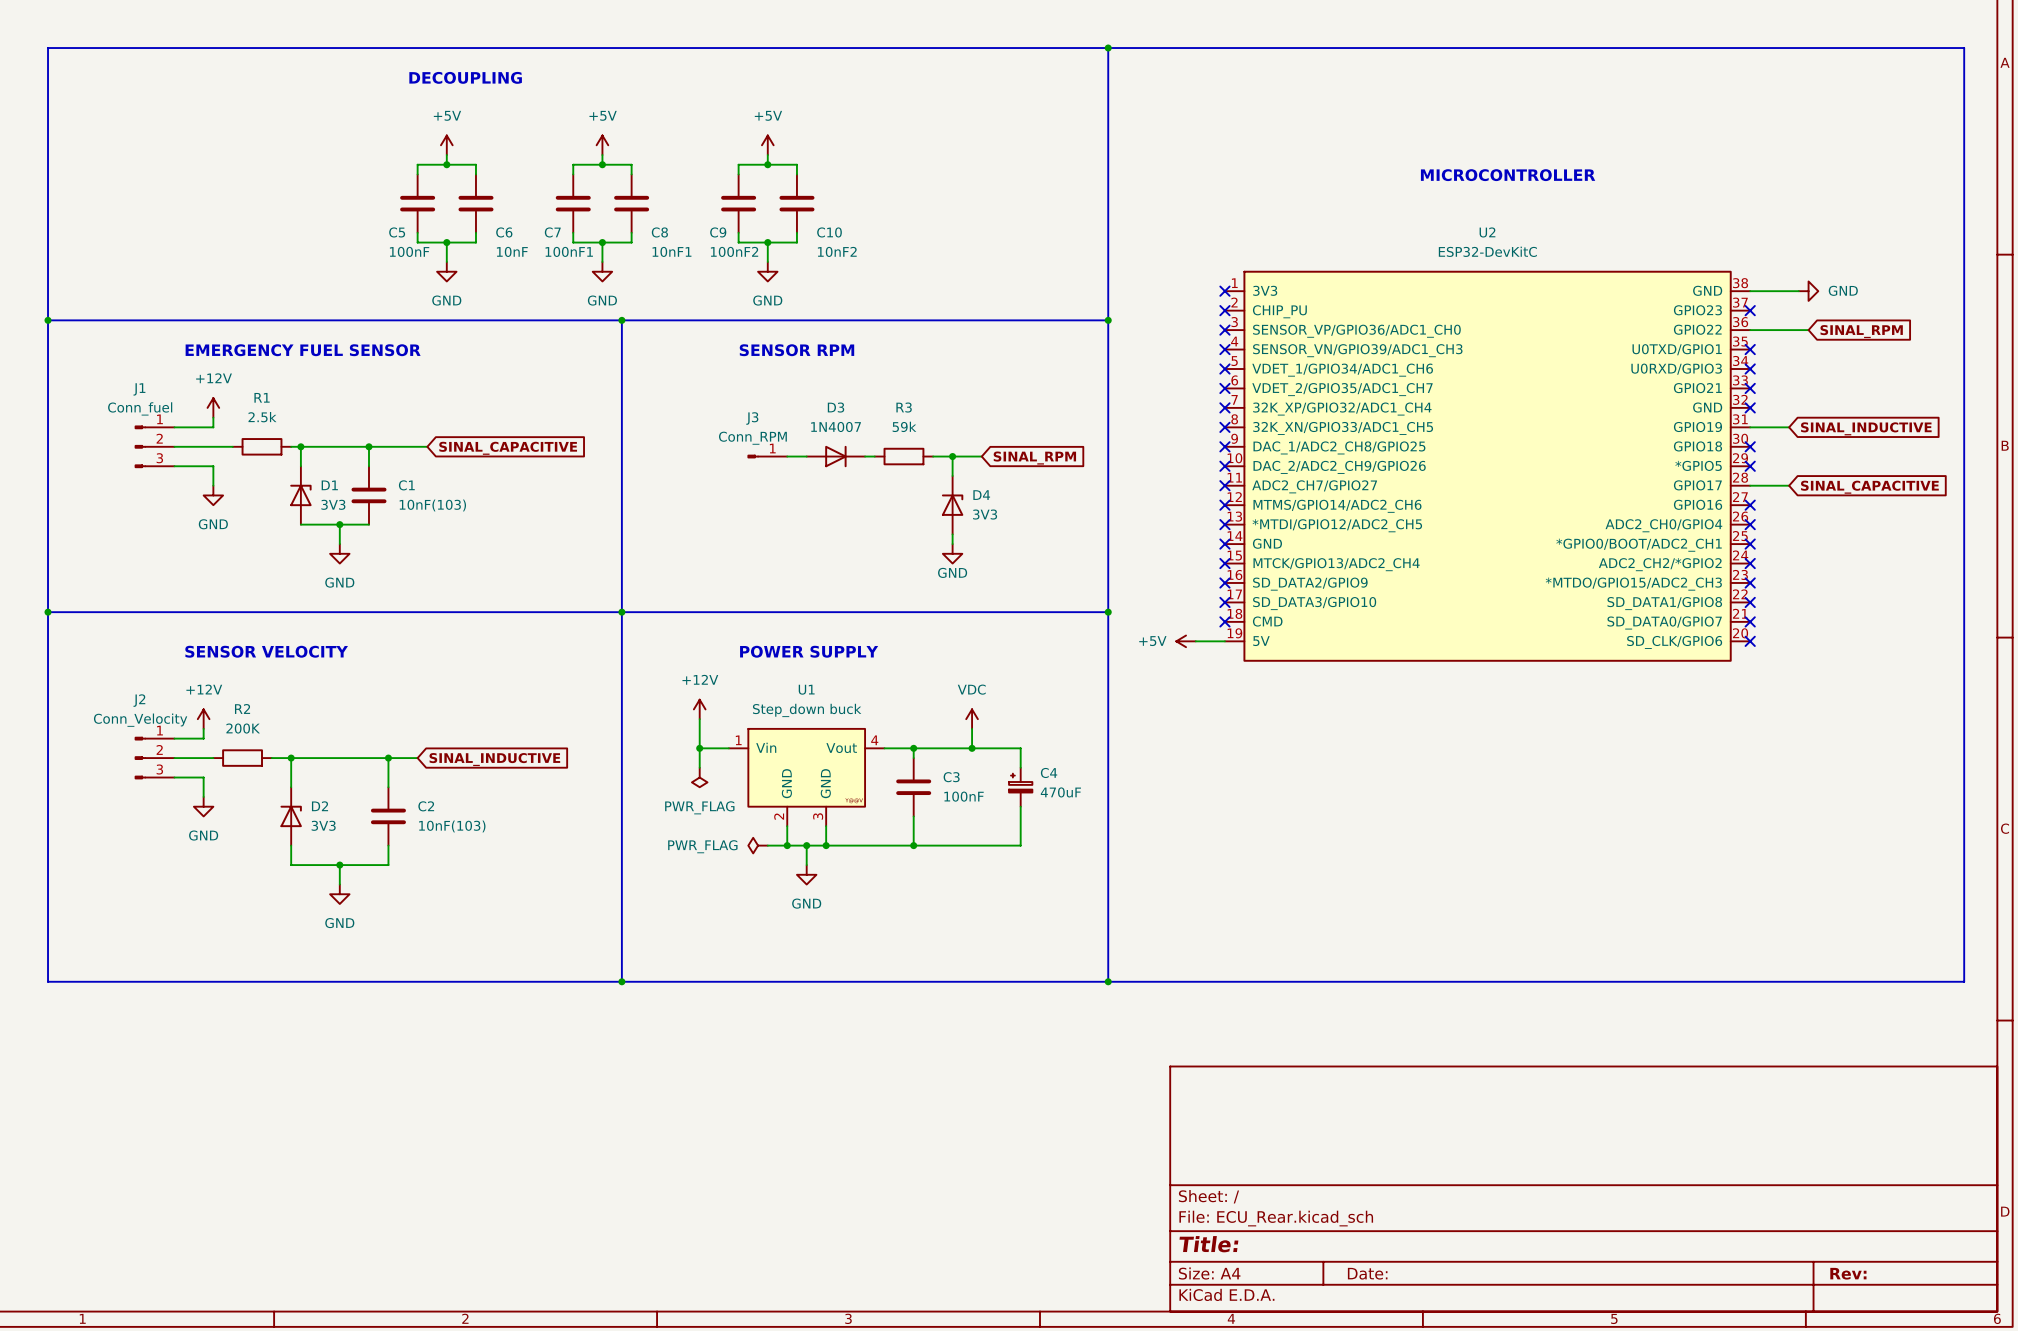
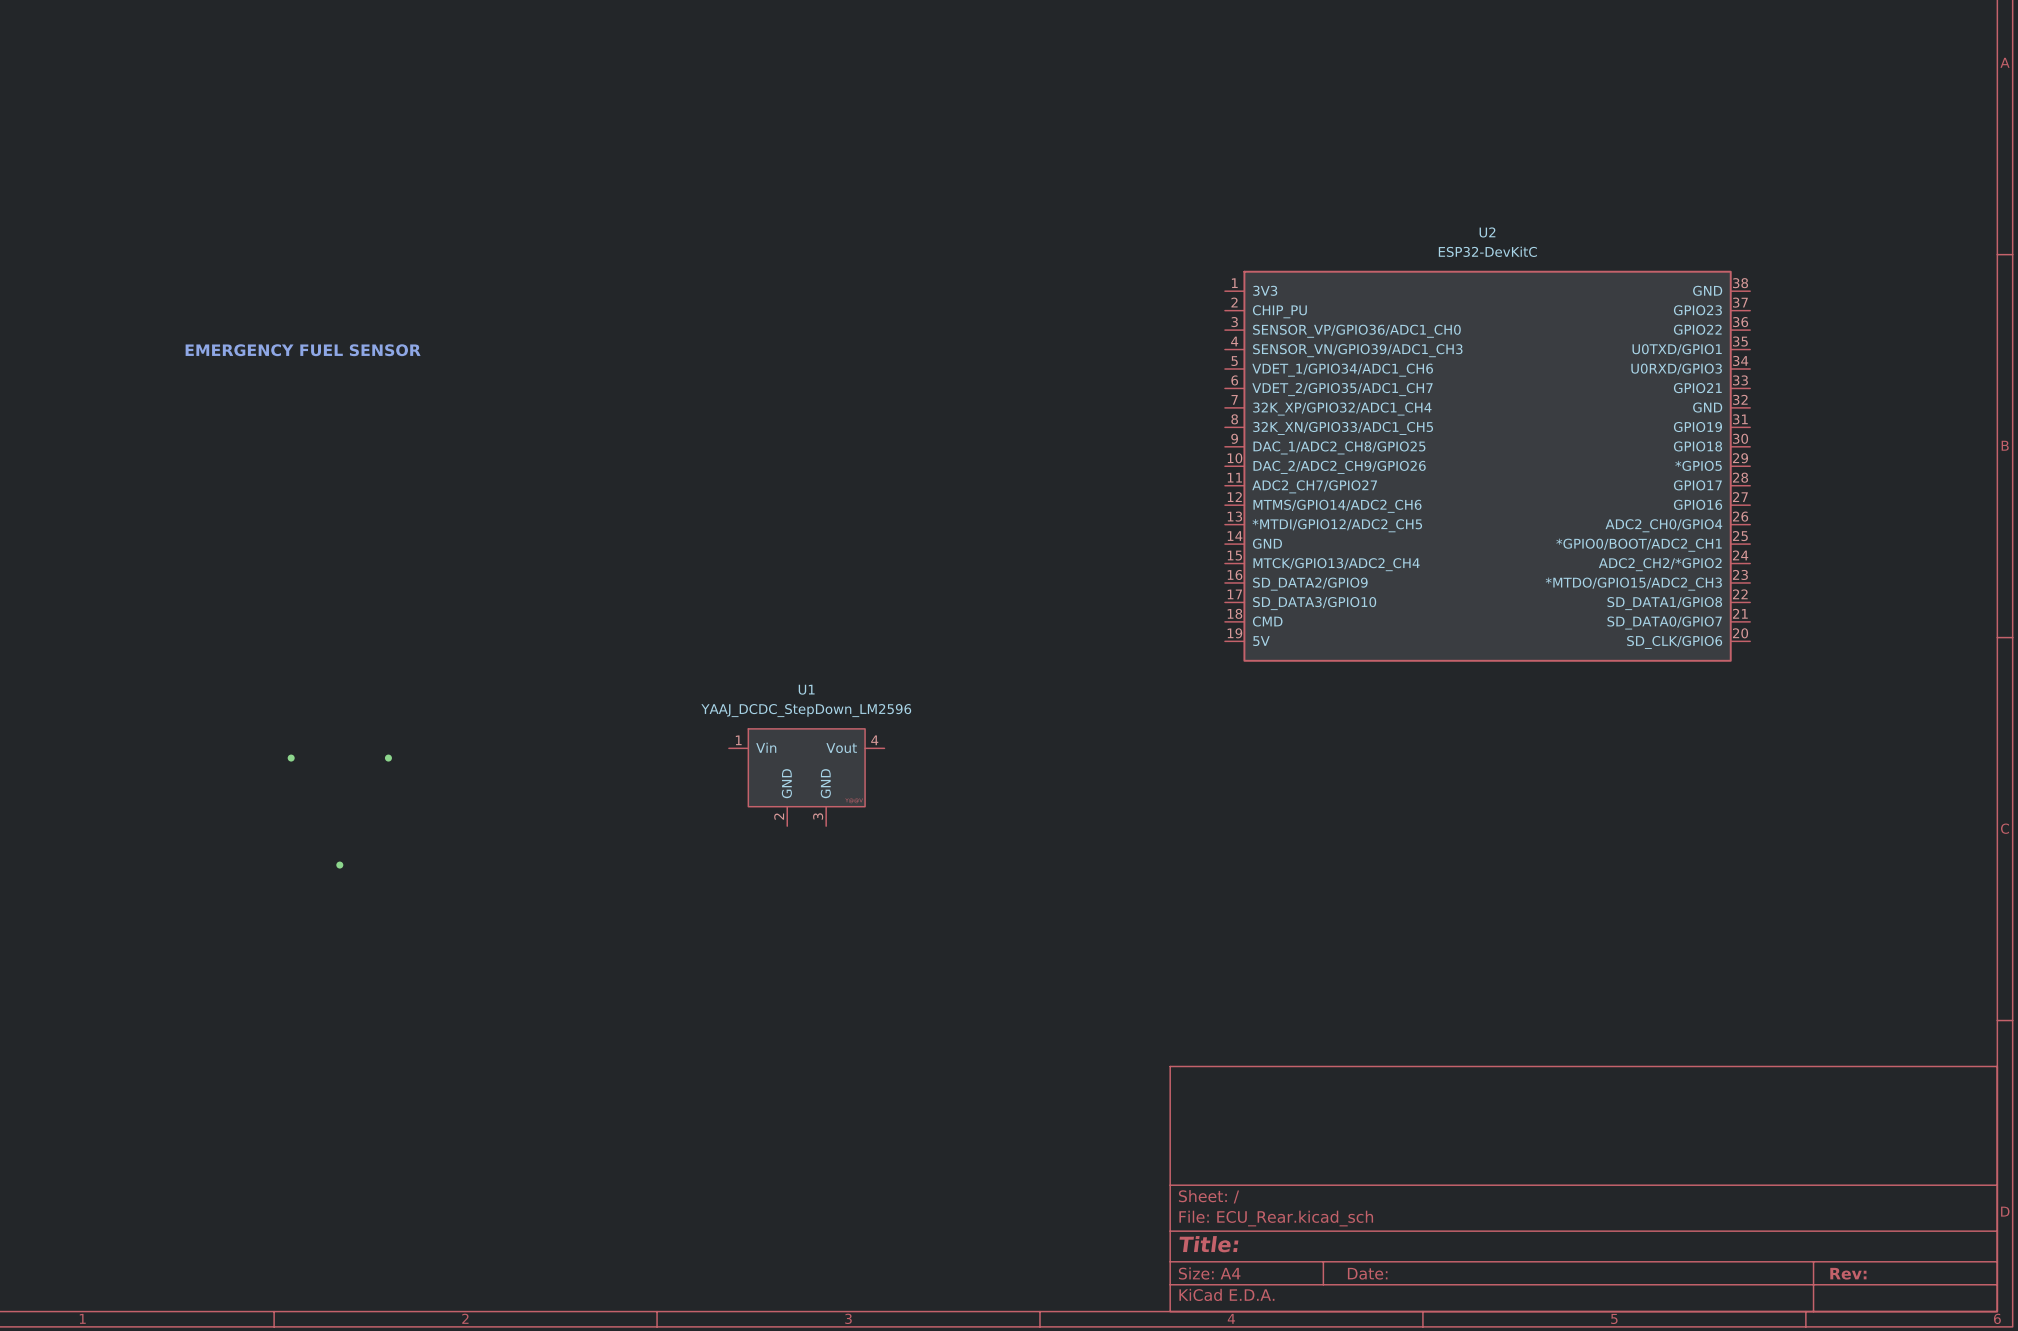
bus: (48, 48) (1964, 48) (1964, 981) (48, 981) (48, 48) -> none
bus: (1108, 48) (1108, 981) -> none
junction: (1108, 48) -> none
text: DECOUPLING (465, 77) -> none
power symbol: +5V (446, 145) -> none
power symbol: +5V (602, 145) -> none
power symbol: +5V (767, 145) -> none
wire: (446, 155) (446, 164) -> none
wire: (602, 155) (602, 164) -> none
wire: (767, 155) (767, 164) -> none
junction: (446, 164) -> none
junction: (602, 164) -> none
junction: (767, 164) -> none
wire: (417, 174) (417, 164) (475, 164) (475, 174) -> none
wire: (573, 174) (573, 164) (631, 164) (631, 174) -> none
wire: (738, 174) (738, 164) (796, 164) (796, 174) -> none
text: MICROCONTROLLER (1508, 175) -> none
100nF: C5 (417, 203) -> none
10nF: C6 (475, 203) -> none
100nF1: C7 (573, 203) -> none
10nF1: C8 (631, 203) -> none
100nF2: C9 (738, 203) -> none
10nF2: C10 (796, 203) -> none
wire: (417, 232) (417, 242) (475, 242) (475, 232) -> none
wire: (573, 232) (573, 242) (631, 242) (631, 232) -> none
wire: (738, 232) (738, 242) (796, 242) (796, 232) -> none
wire: (446, 242) (446, 262) -> none
junction: (446, 242) -> none
wire: (602, 242) (602, 262) -> none
junction: (602, 242) -> none
wire: (767, 242) (767, 262) -> none
junction: (767, 242) -> none
power symbol: GND (446, 271) -> none
power symbol: GND (602, 271) -> none
power symbol: GND (767, 271) -> none
no-connect mark: (1224, 291) -> none
wire: (1750, 291) (1798, 291) -> none
power symbol: GND (1808, 291) -> none
no-connect mark: (1224, 310) -> none
no-connect mark: (1750, 310) -> none
bus: (48, 320) (1108, 320) -> none
junction: (48, 320) -> none
bus: (621, 320) (621, 981) -> none
junction: (621, 320) -> none
junction: (1108, 320) -> none
no-connect mark: (1224, 330) -> none
wire: (1750, 330) (1808, 330) -> none
global label: SINAL_RPM (1861, 331) -> none
no-connect mark: (1224, 349) -> none
no-connect mark: (1750, 349) -> none
text: SENSOR RPM (796, 350) -> none
no-connect mark: (1224, 368) -> none
no-connect mark: (1750, 368) -> none
no-connect mark: (1224, 388) -> none
no-connect mark: (1750, 388) -> none
power symbol: +12V (213, 407) -> none
no-connect mark: (1224, 407) -> none
no-connect mark: (1750, 407) -> none
wire: (213, 417) (213, 427) (174, 427) -> none
no-connect mark: (1224, 427) -> none
wire: (1750, 427) (1789, 427) -> none
global label: SINAL_INDUCTIVE (1866, 428) -> none
J1: Conn_fuel (154, 446) -> none
wire: (174, 446) (232, 446) -> none
R1: 2.5k (262, 446) -> none
wire: (291, 446) (427, 446) -> none
wire: (300, 446) (300, 466) -> none
junction: (300, 446) -> none
wire: (368, 446) (368, 466) -> none
junction: (368, 446) -> none
no-connect mark: (1224, 446) -> none
no-connect mark: (1750, 446) -> none
global label: SINAL_CAPACITIVE (508, 448) -> none
J3: Conn_RPM (767, 456) -> none
wire: (787, 456) (806, 456) -> none
D3: 1N4007 (835, 456) -> none
wire: (865, 456) (874, 456) -> none
R3: 59k (903, 456) -> none
wire: (933, 456) (981, 456) -> none
wire: (952, 456) (952, 475) -> none
junction: (952, 456) -> none
global label: SINAL_RPM (1034, 458) -> none
wire: (174, 466) (213, 466) (213, 485) -> none
no-connect mark: (1224, 466) -> none
no-connect mark: (1750, 466) -> none
no-connect mark: (1224, 485) -> none
wire: (1750, 485) (1789, 485) -> none
global label: SINAL_CAPACITIVE (1869, 487) -> none
power symbol: GND (213, 495) -> none
D1: 3V3 (300, 495) -> none
C1: 10nF(103) (368, 495) -> none
D4: 3V3 (952, 505) -> none
no-connect mark: (1224, 505) -> none
no-connect mark: (1750, 505) -> none
wire: (300, 524) (368, 524) -> none
wire: (339, 524) (339, 544) -> none
junction: (339, 524) -> none
no-connect mark: (1224, 524) -> none
no-connect mark: (1750, 524) -> none
wire: (952, 534) (952, 544) -> none
no-connect mark: (1224, 544) -> none
no-connect mark: (1750, 544) -> none
power symbol: GND (339, 553) -> none
power symbol: GND (952, 553) -> none
no-connect mark: (1224, 563) -> none
no-connect mark: (1750, 563) -> none
no-connect mark: (1224, 582) -> none
no-connect mark: (1750, 582) -> none
no-connect mark: (1224, 602) -> none
no-connect mark: (1750, 602) -> none
bus: (48, 612) (1108, 612) -> none
junction: (48, 612) -> none
junction: (621, 612) -> none
junction: (1108, 612) -> none
no-connect mark: (1224, 621) -> none
no-connect mark: (1750, 621) -> none
power symbol: +5V (1186, 641) -> none
wire: (1195, 641) (1224, 641) -> none
no-connect mark: (1750, 641) -> none
text: SENSOR VELOCITY (266, 651) -> none
text: POWER SUPPLY (809, 651) -> none
power symbol: +12V (699, 709) -> none
U1 value: Step_down buck (807, 710) -> YAAJ_DCDC_StepDown_LM2596 (806, 710)
power symbol: +12V (203, 719) -> none
wire: (699, 719) (699, 767) -> none
power symbol: VDC (972, 719) -> none
wire: (203, 728) (203, 738) (174, 738) -> none
wire: (972, 728) (972, 748) -> none
wire: (699, 748) (728, 748) -> none
junction: (699, 748) -> none
wire: (884, 748) (1020, 748) (1020, 767) -> none
wire: (913, 748) (913, 758) -> none
junction: (913, 748) -> none
junction: (972, 748) -> none
J2: Conn_Velocity (154, 758) -> none
wire: (174, 758) (213, 758) -> none
R2: 200K (242, 758) -> none
wire: (271, 758) (417, 758) -> none
wire: (291, 758) (291, 787) -> none
wire: (388, 758) (388, 787) -> none
global label: SINAL_INDUCTIVE (494, 759) -> none
wire: (174, 777) (203, 777) (203, 796) -> none
power symbol: PWR_FLAG (699, 777) -> none
C3: 100nF (913, 787) -> none
C4: 470uF (1020, 787) -> none
power symbol: GND (203, 806) -> none
wire: (1020, 806) (1020, 845) (767, 845) -> none
D2: 3V3 (291, 816) -> none
C2: 10nF(103) (388, 816) -> none
wire: (913, 816) (913, 845) -> none
wire: (787, 826) (787, 845) -> none
wire: (826, 826) (826, 845) -> none
wire: (291, 845) (291, 865) (388, 865) (388, 845) -> none
power symbol: PWR_FLAG (758, 845) -> none
junction: (787, 845) -> none
wire: (806, 845) (806, 865) -> none
junction: (806, 845) -> none
junction: (826, 845) -> none
junction: (913, 845) -> none
wire: (339, 865) (339, 884) -> none
power symbol: GND (806, 874) -> none
power symbol: GND (339, 894) -> none
junction: (621, 981) -> none
junction: (1108, 981) -> none

